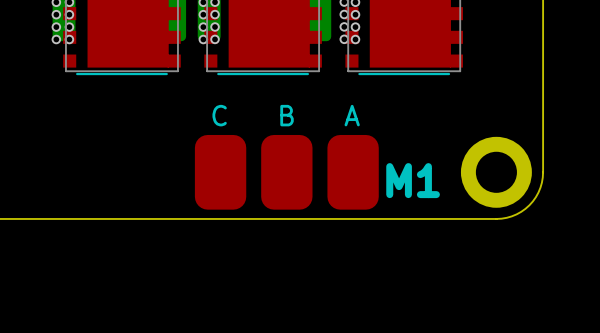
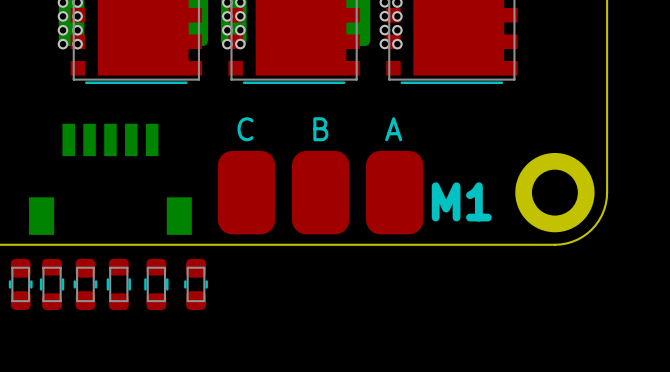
part: none -> (110, 179)
part: none -> (20, 284)
part: none -> (52, 284)
part: none -> (85, 284)
part: none -> (118, 284)
part: none -> (156, 284)
part: none -> (196, 284)

